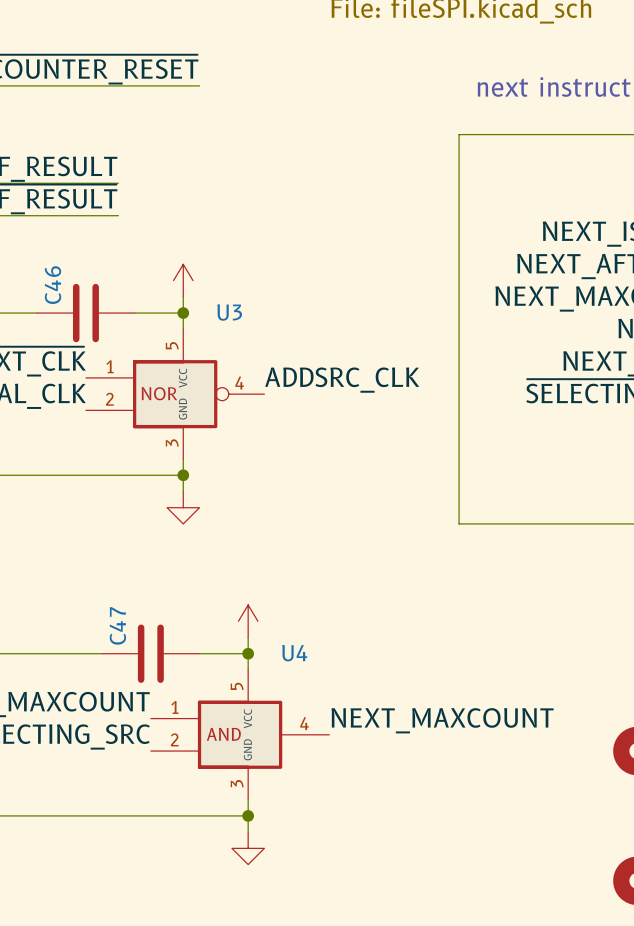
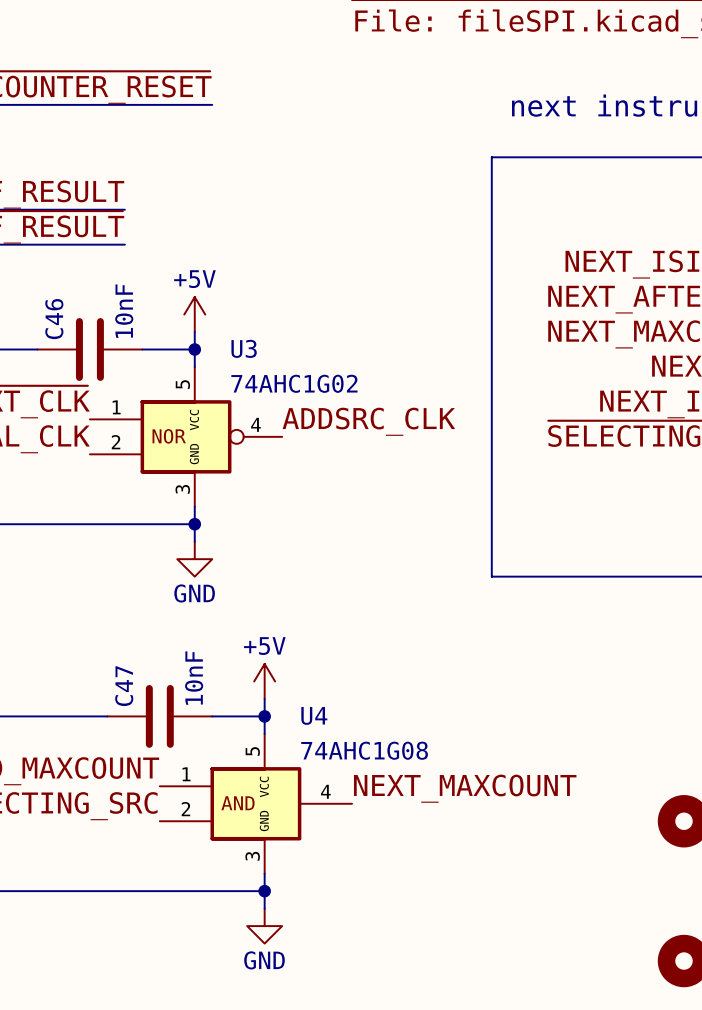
power symbol text: none -> +5V (194, 279)
C46 value: none -> 10nF (124, 311)
U3 value: none -> 74AHC1G02 (294, 383)
power symbol text: none -> GND (194, 593)
power symbol text: none -> +5V (264, 646)
C47 value: none -> 10nF (194, 678)
U4 value: none -> 74AHC1G08 (364, 750)
power symbol text: none -> GND (264, 960)

